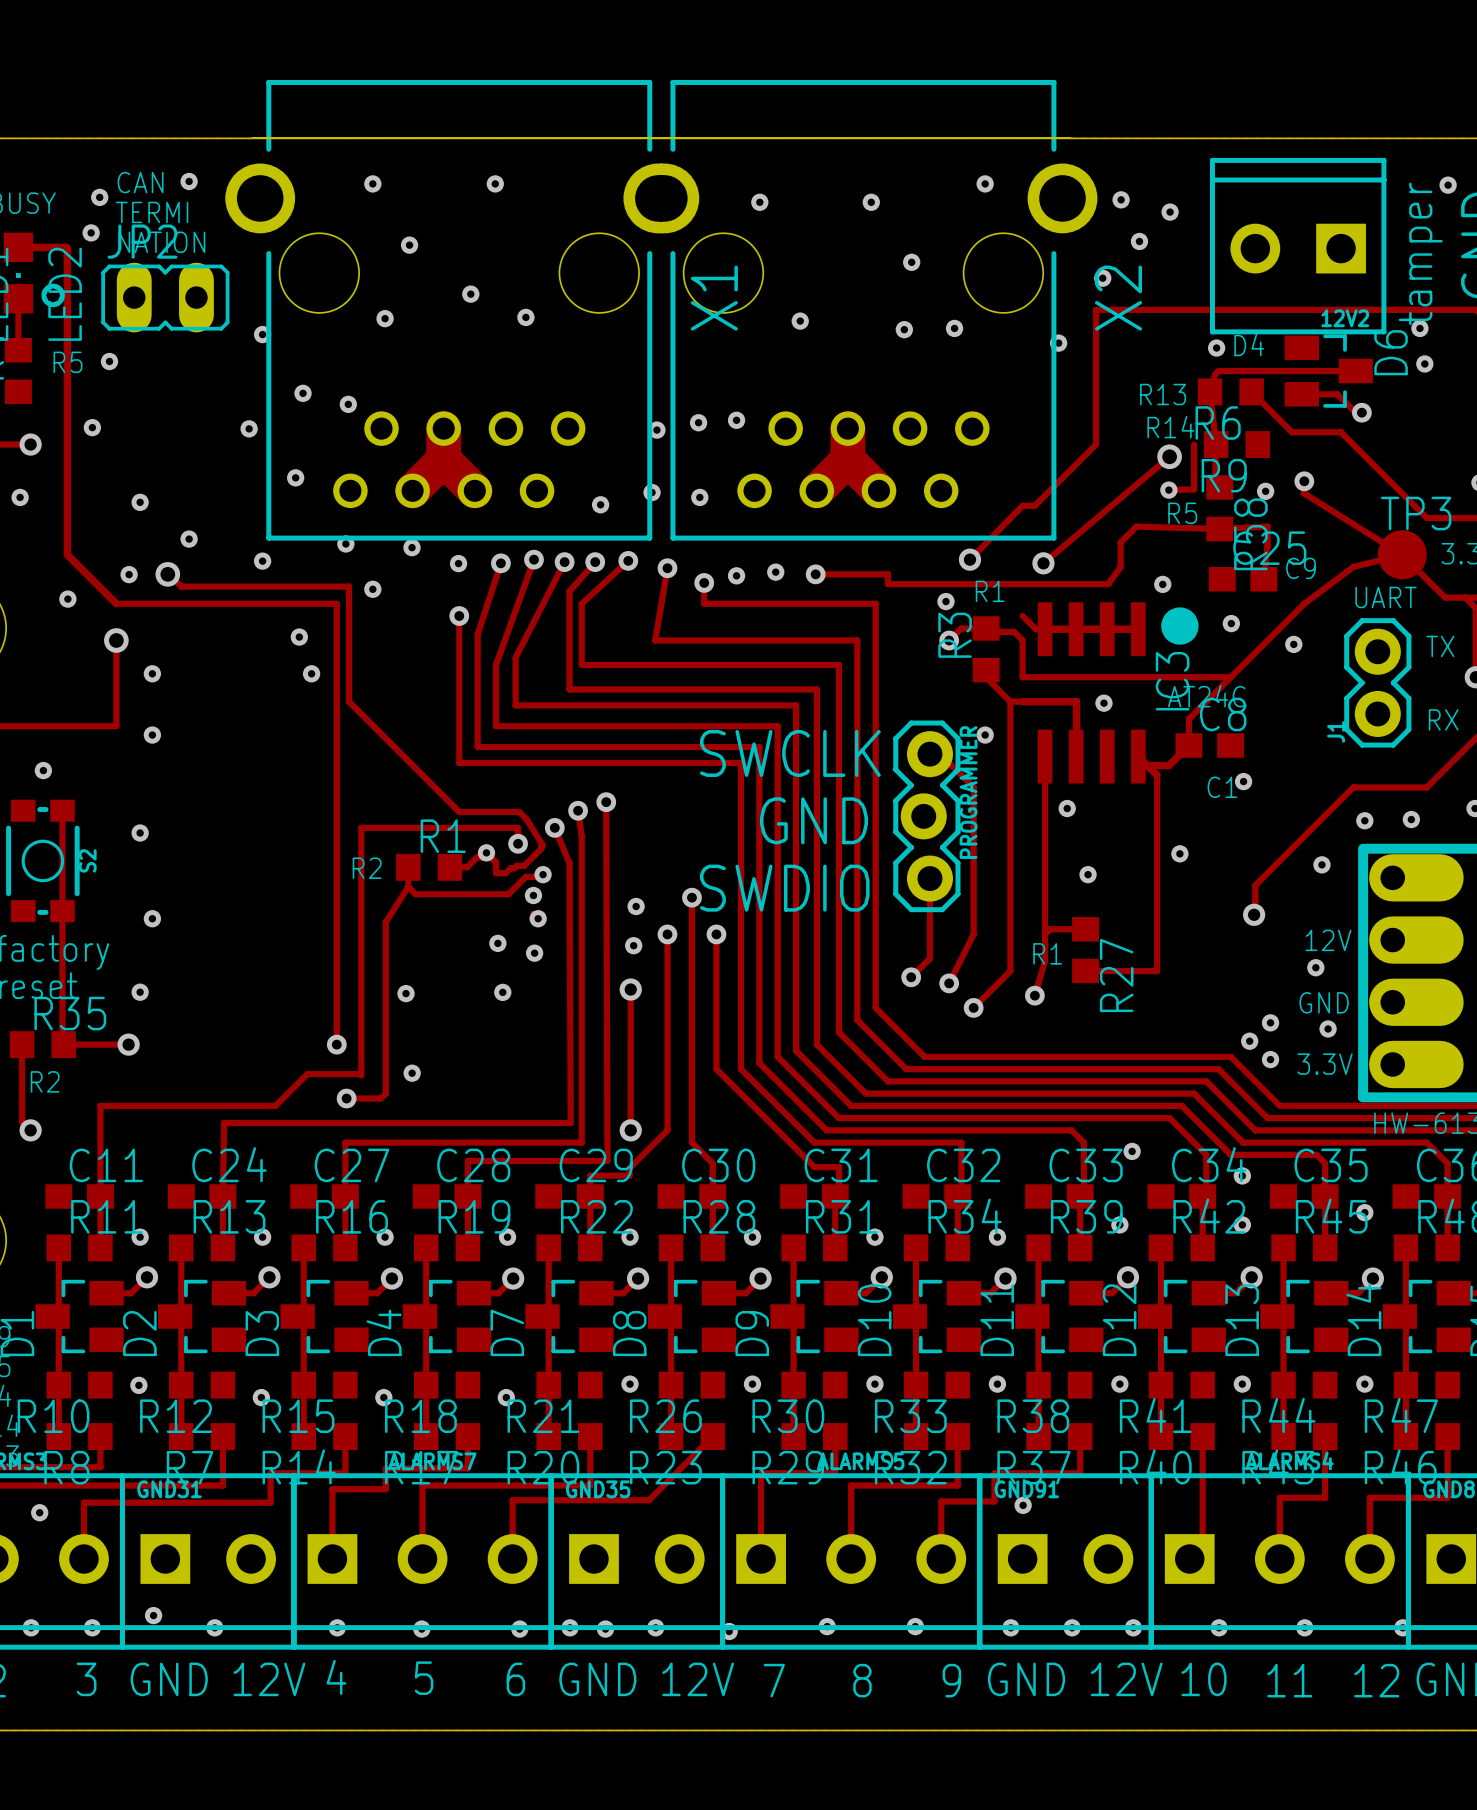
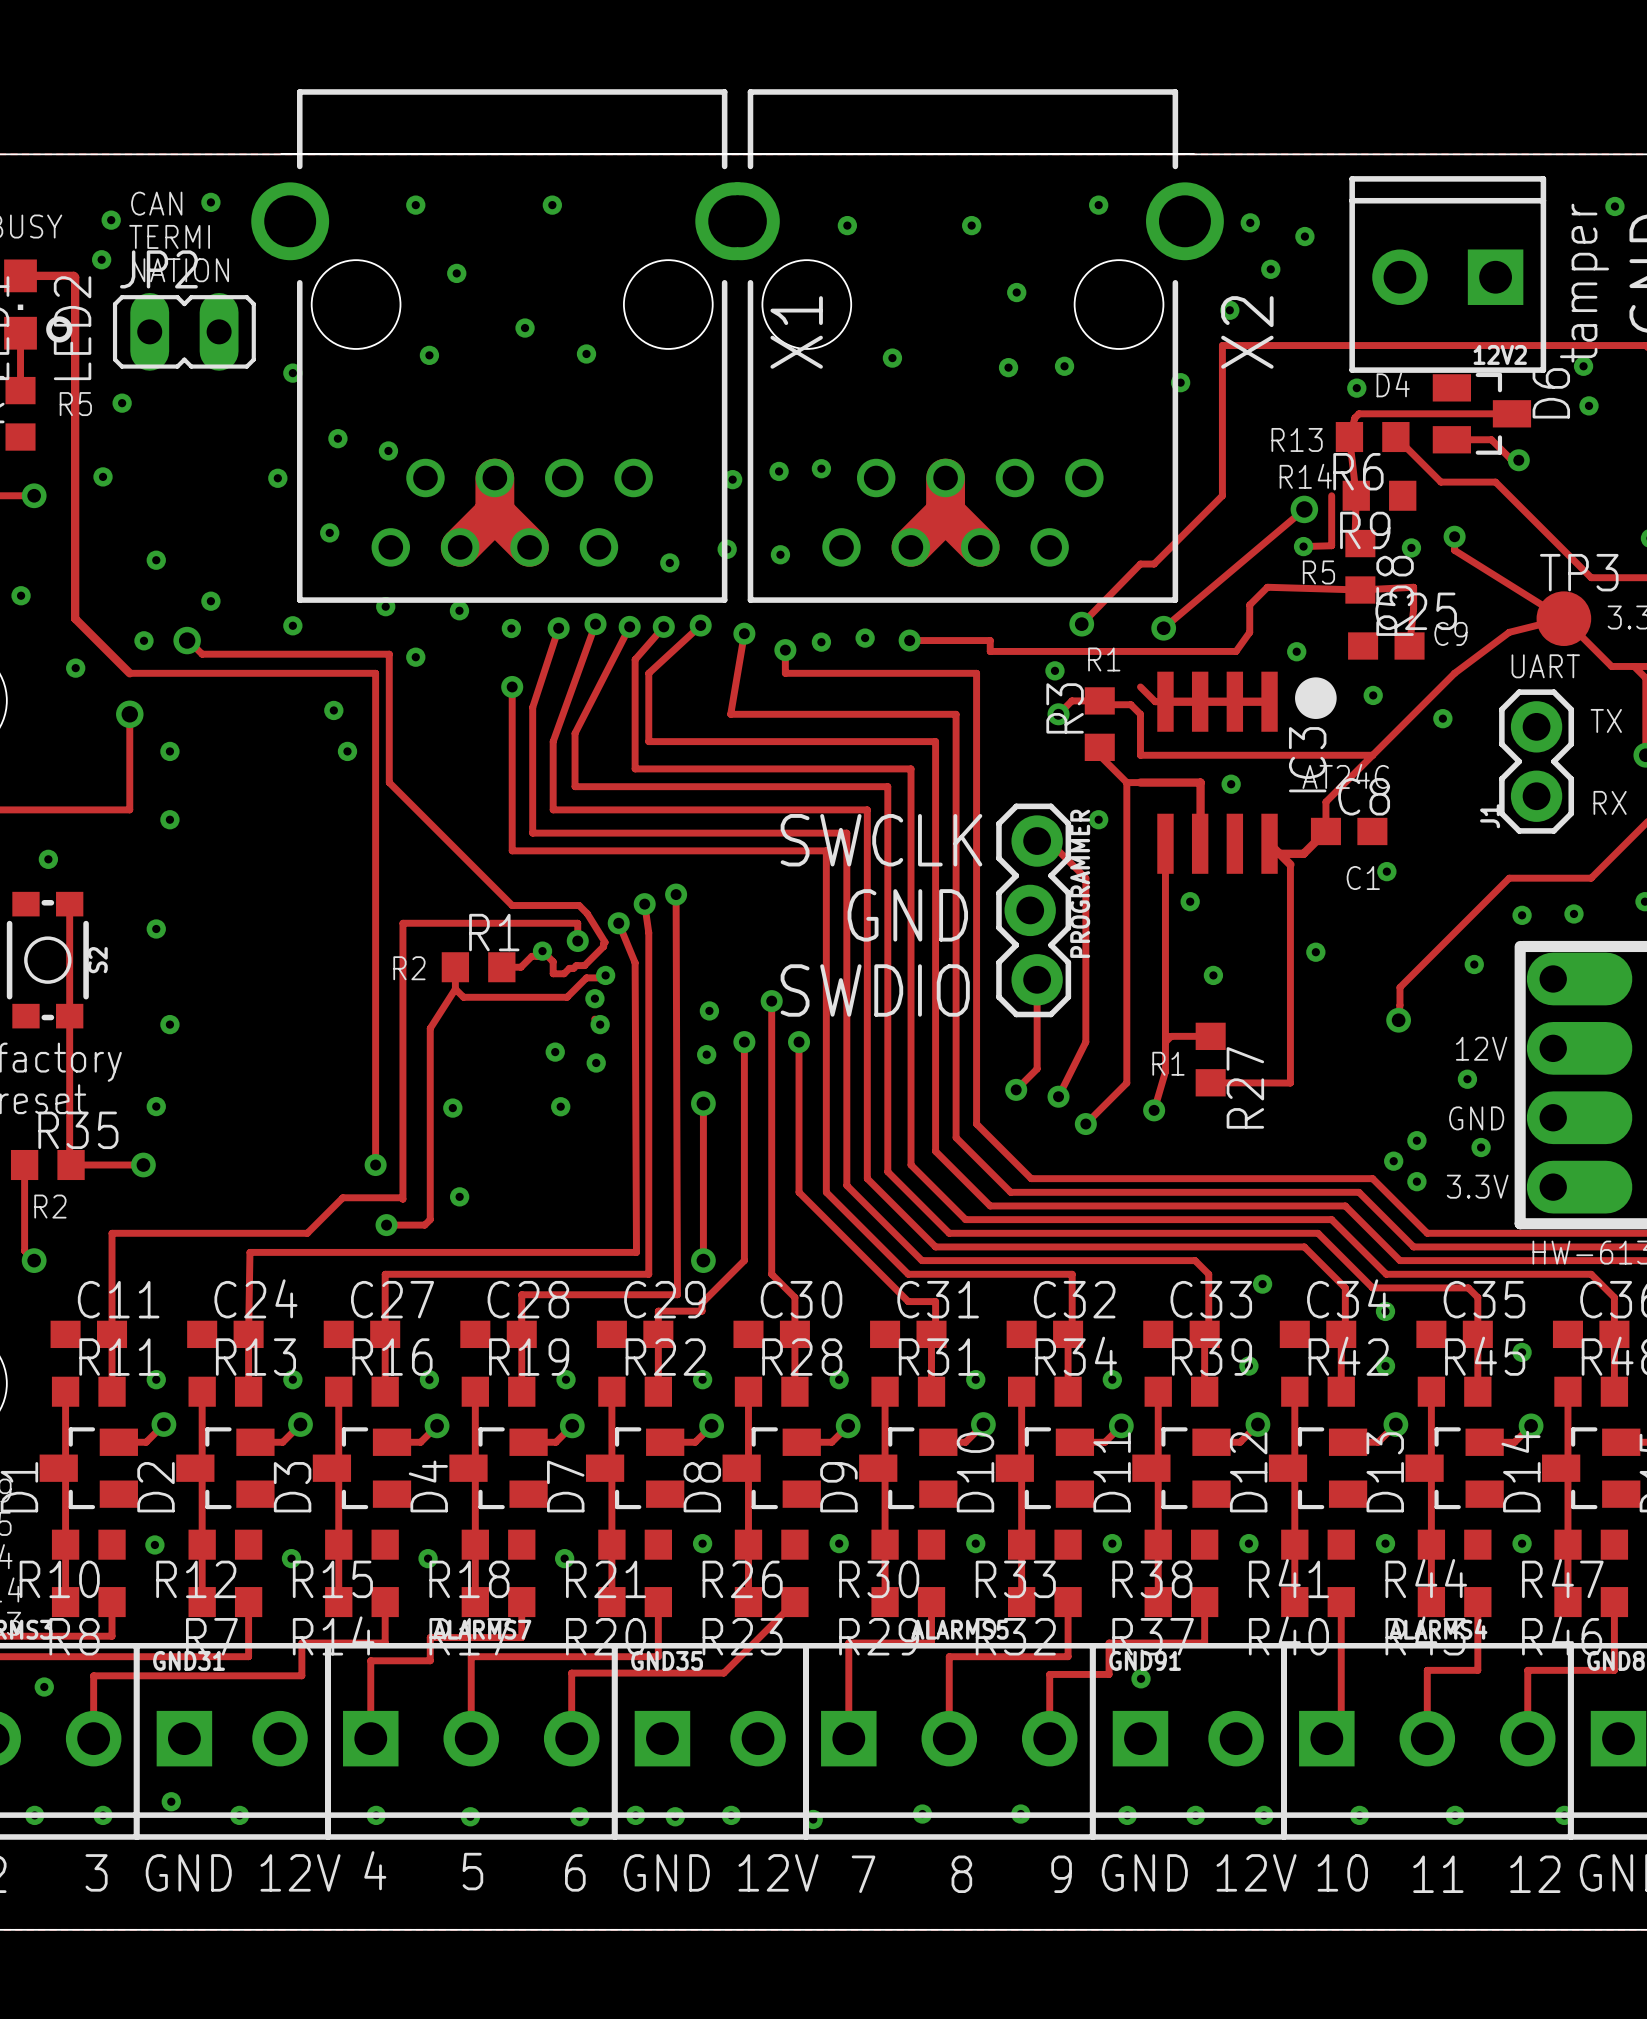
via: (20, 497) -> none
via: none -> (21, 595)

